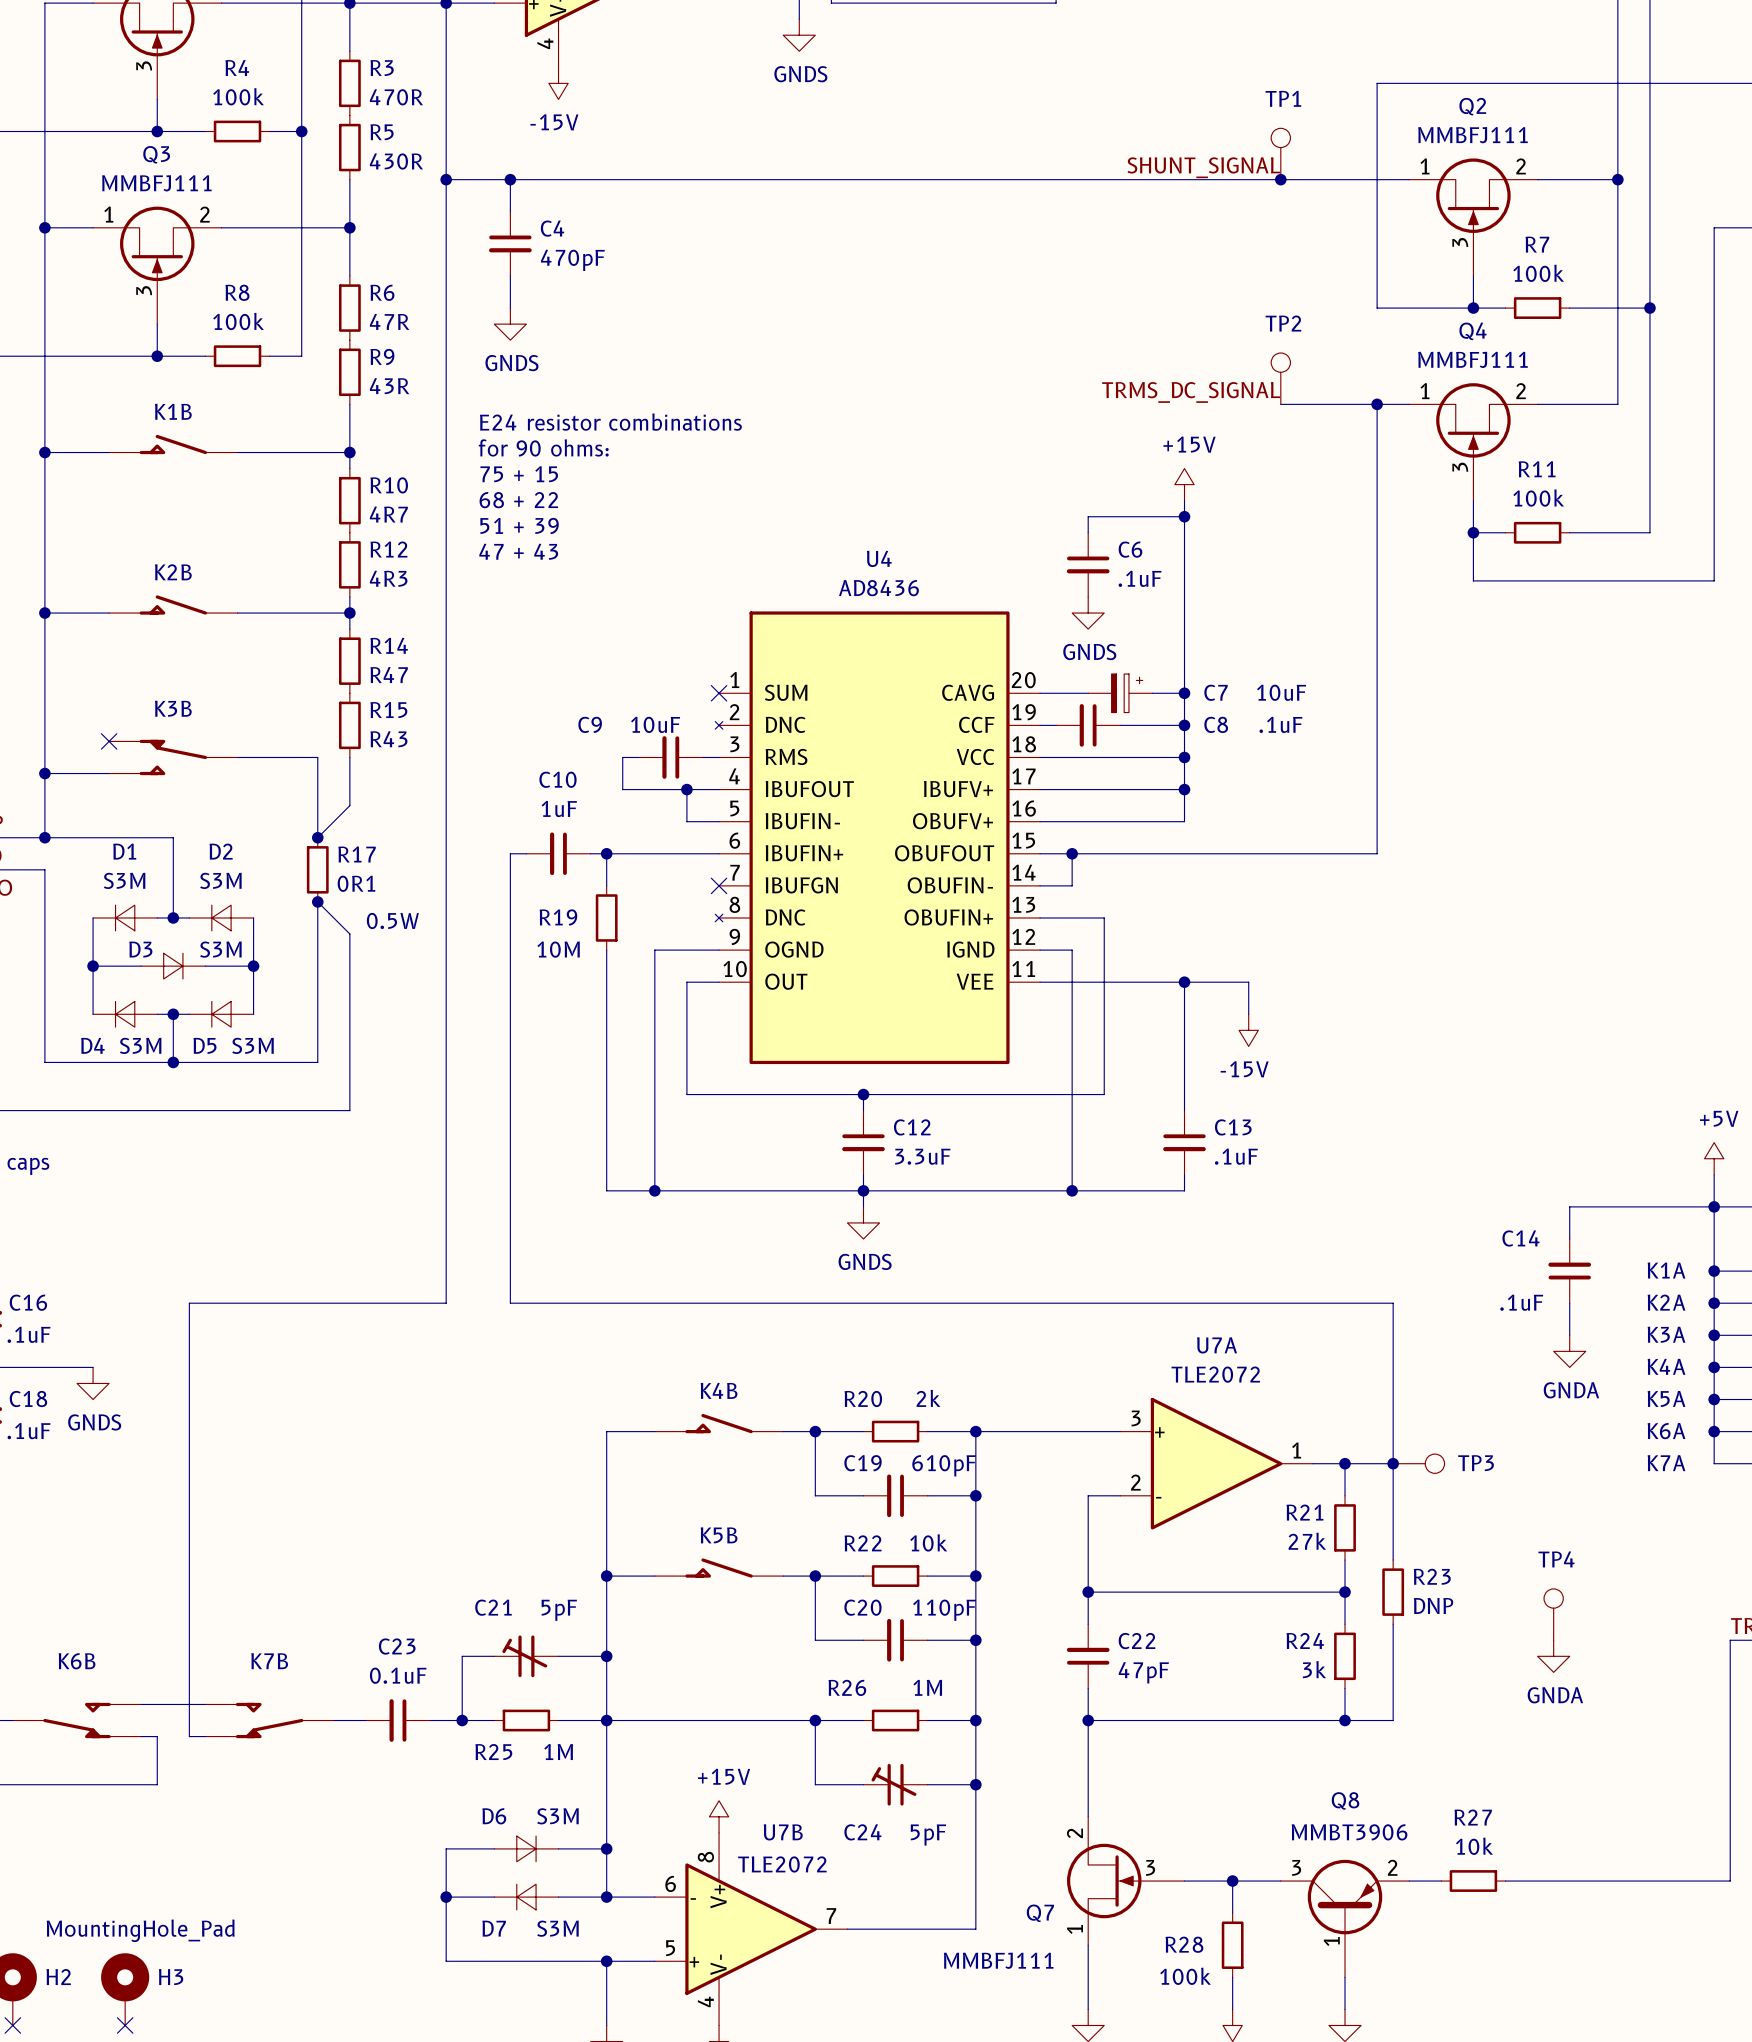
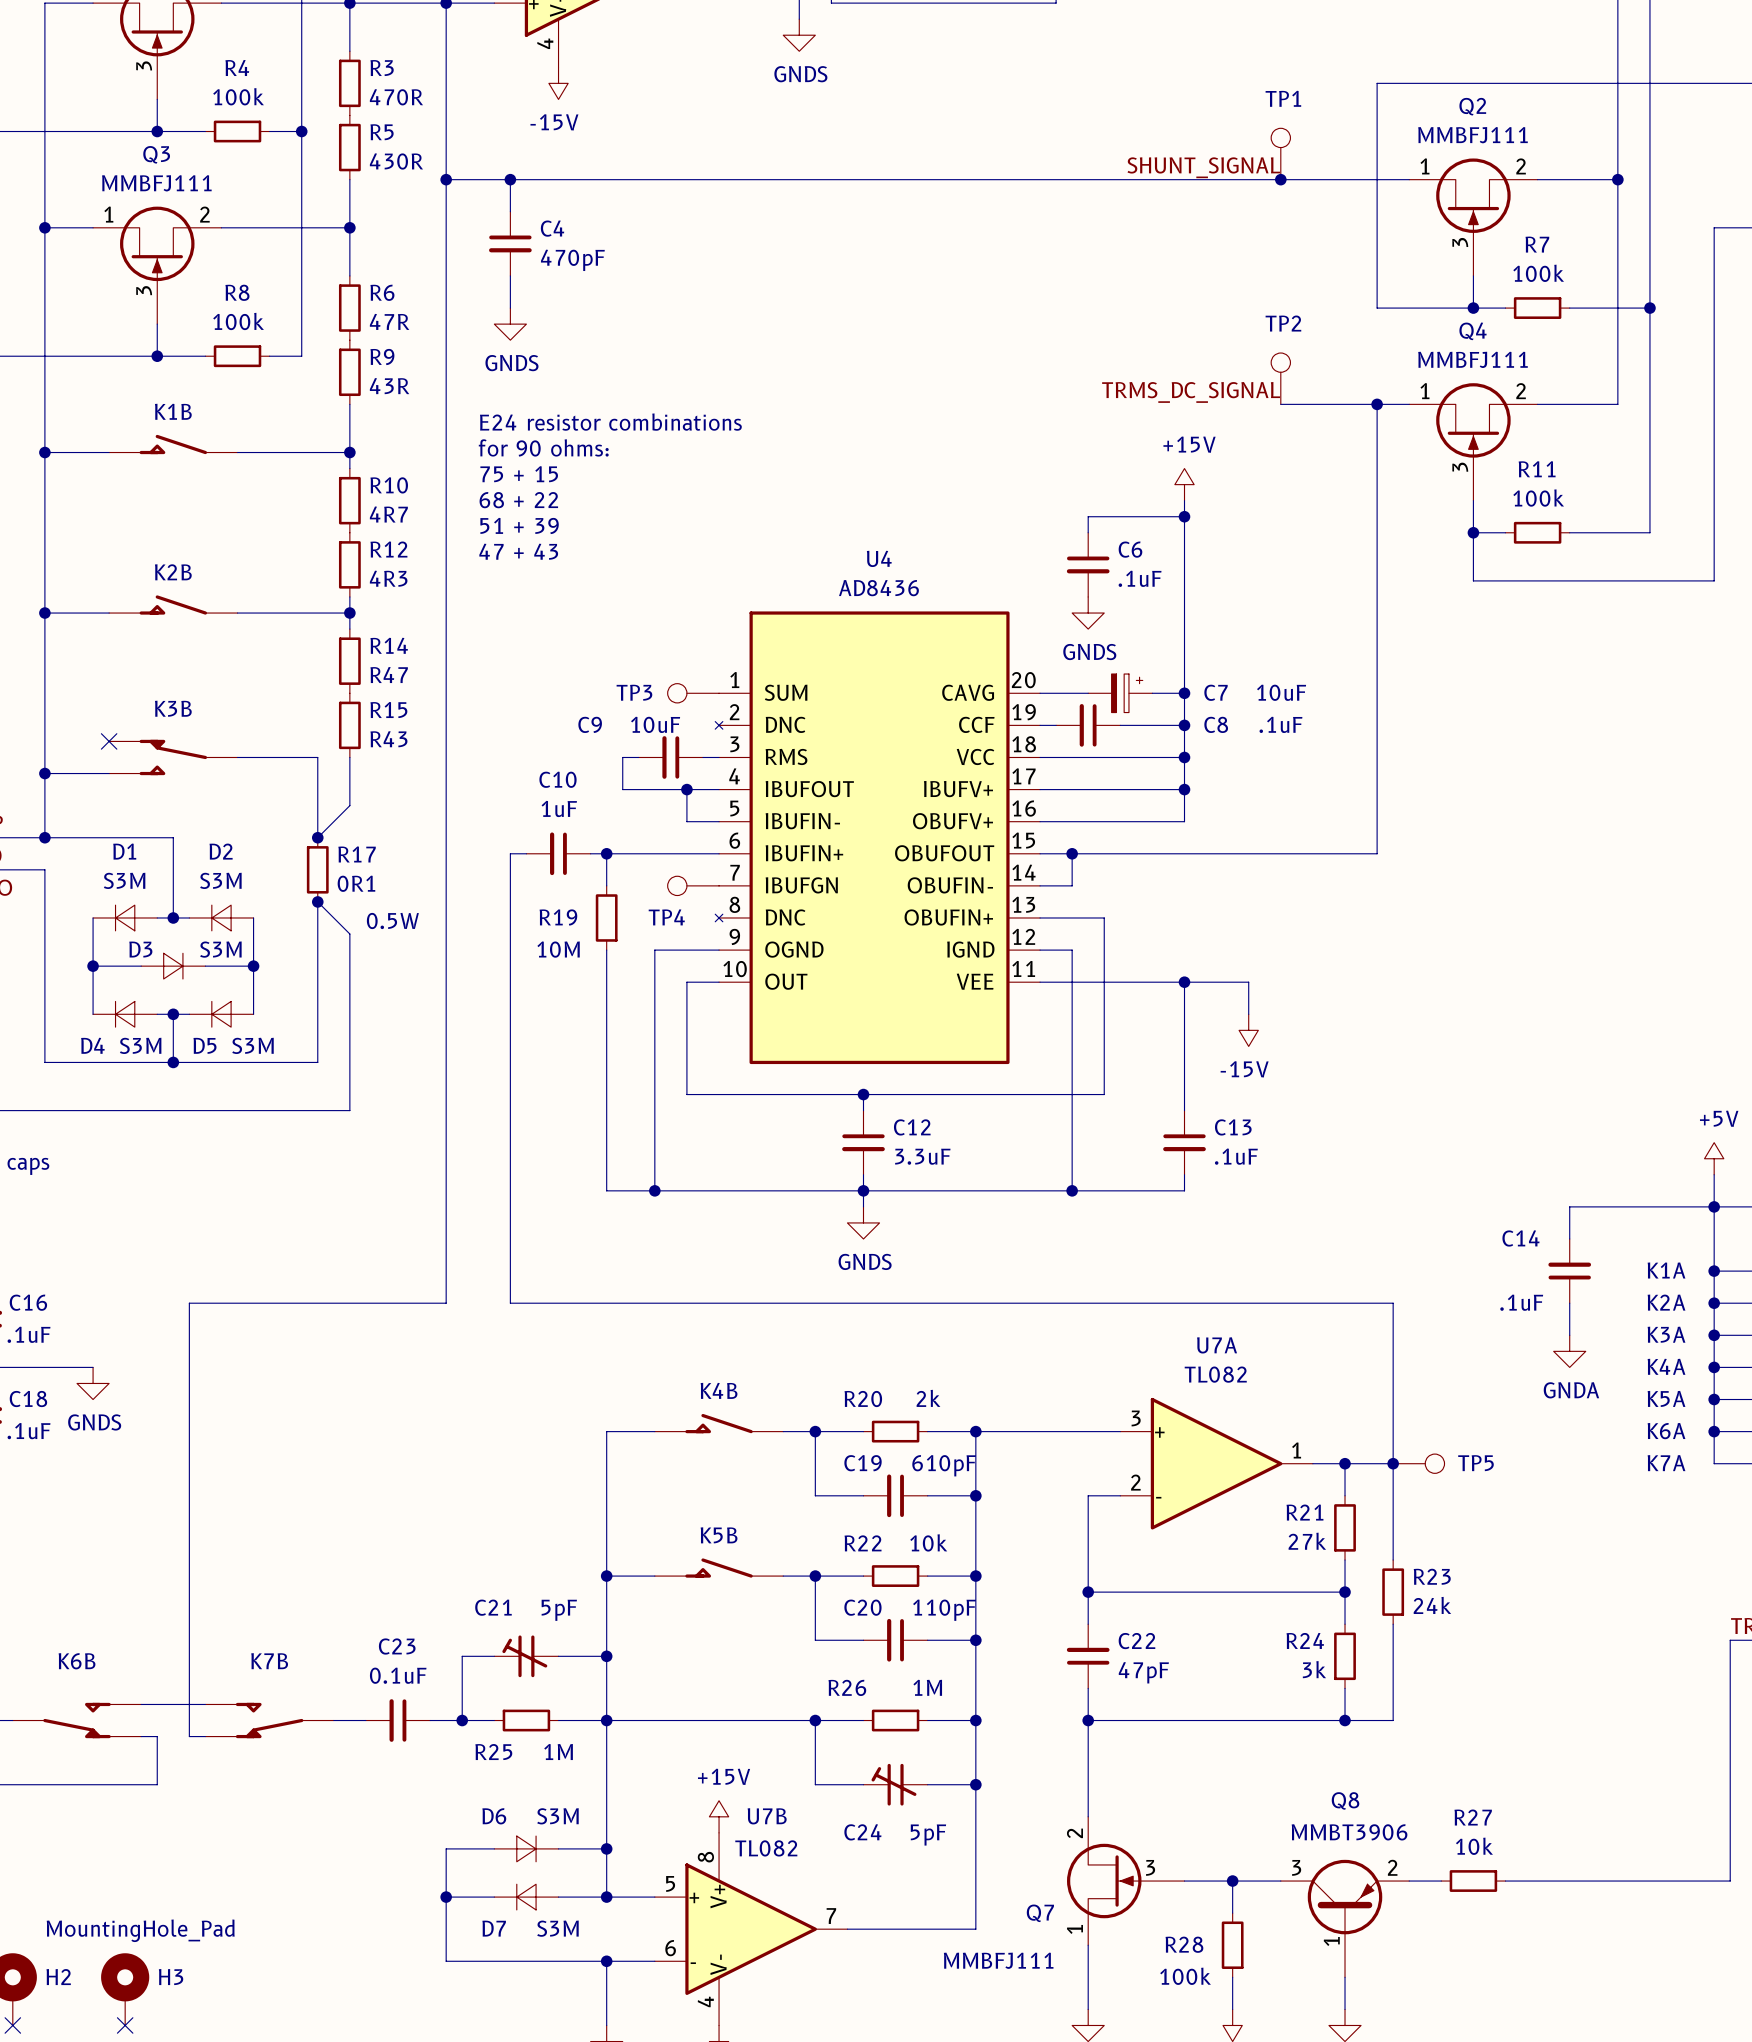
TP3: none -> (693, 693)
no-connect mark: (719, 693) -> none
no-connect mark: (719, 885) -> none
U7A value: TLE2072 (1215, 1374) -> TL082 (1215, 1374)
TP3 name: TP3 (1476, 1463) -> TP5 (1475, 1463)
TP4 name position: TP4 (1556, 1559) -> TP4 (666, 917)
TP4 rotation: 0° (1553, 1598) -> 90° counterclockwise (677, 885)
R23 value: DNP (1433, 1605) -> 24k (1432, 1605)
TP4 position: (1553, 1614) -> (693, 885)
power symbol: GNDA (1553, 1656) -> none
U7B value: TLE2072 (782, 1864) -> TL082 (766, 1848)
U7B flip: as is (751, 1929) -> up-down (751, 1929)

